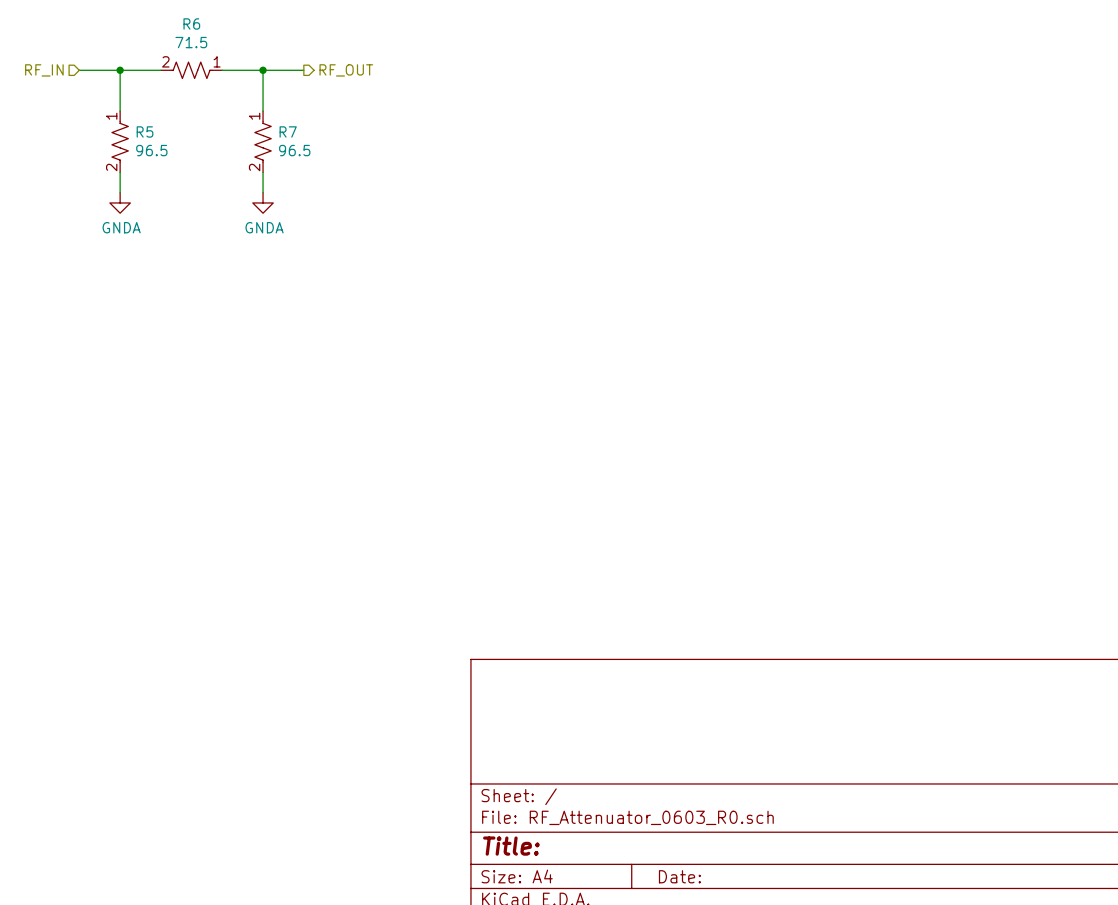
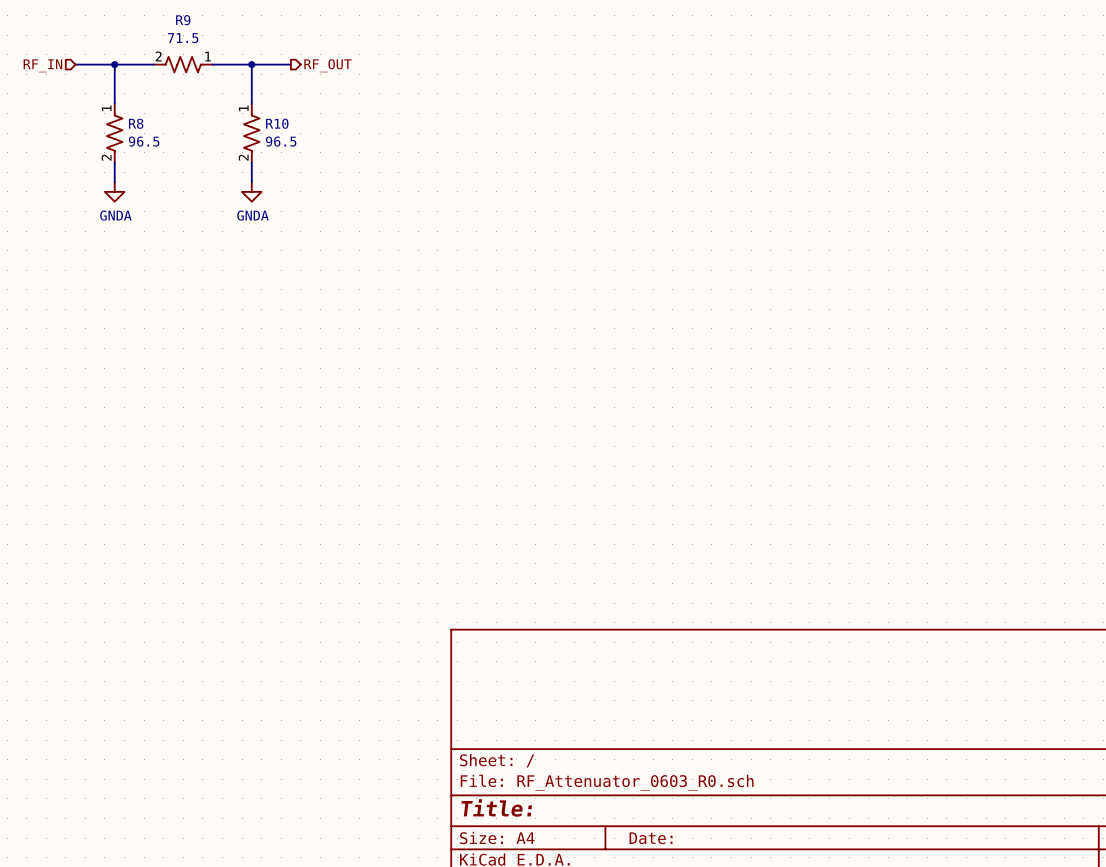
R6 name: R6 (191, 23) -> R9 (183, 20)
R5 name: R5 (145, 131) -> R8 (136, 123)
R7 name: R7 (288, 131) -> R10 (277, 123)

